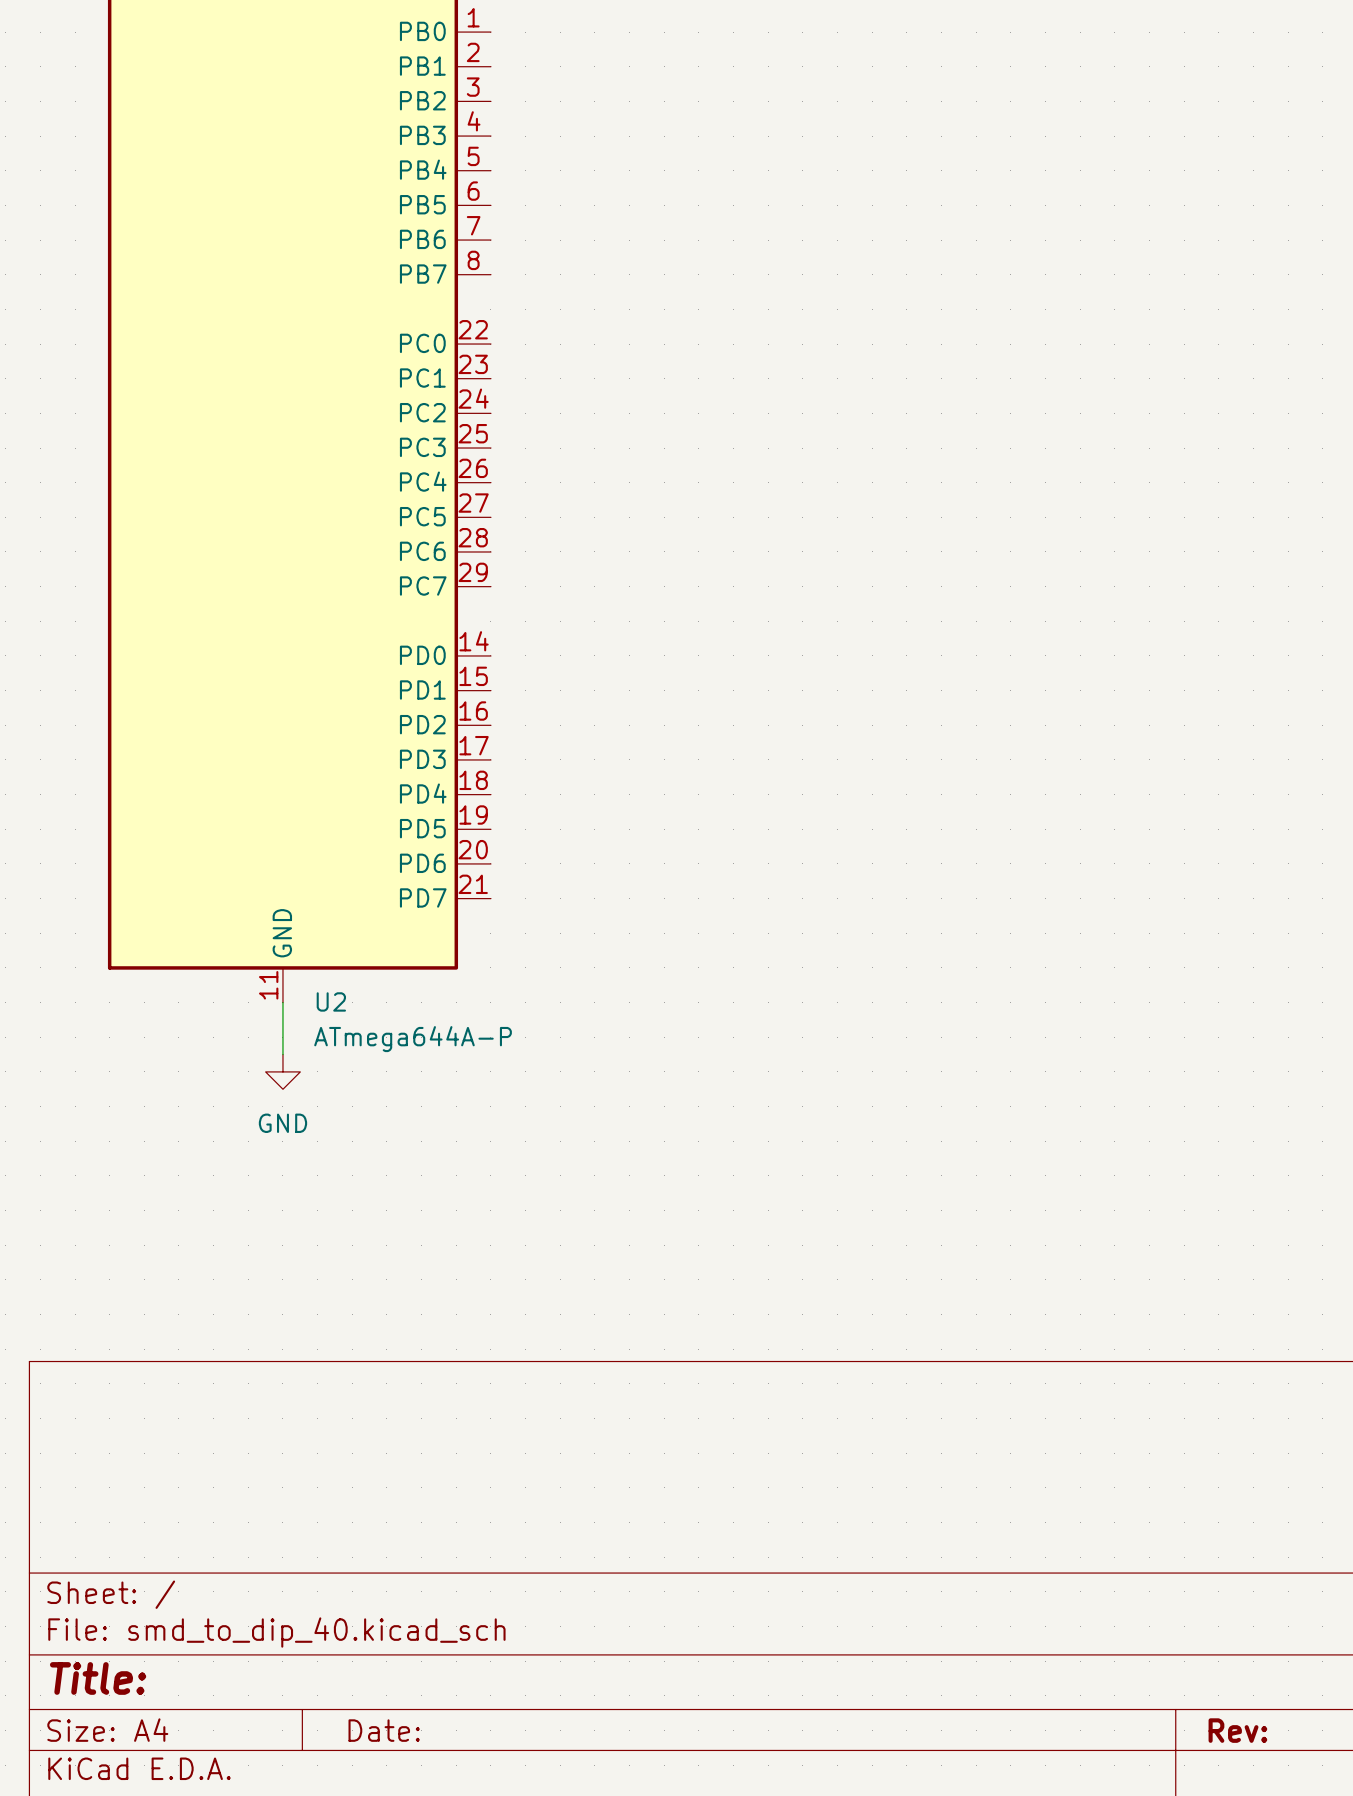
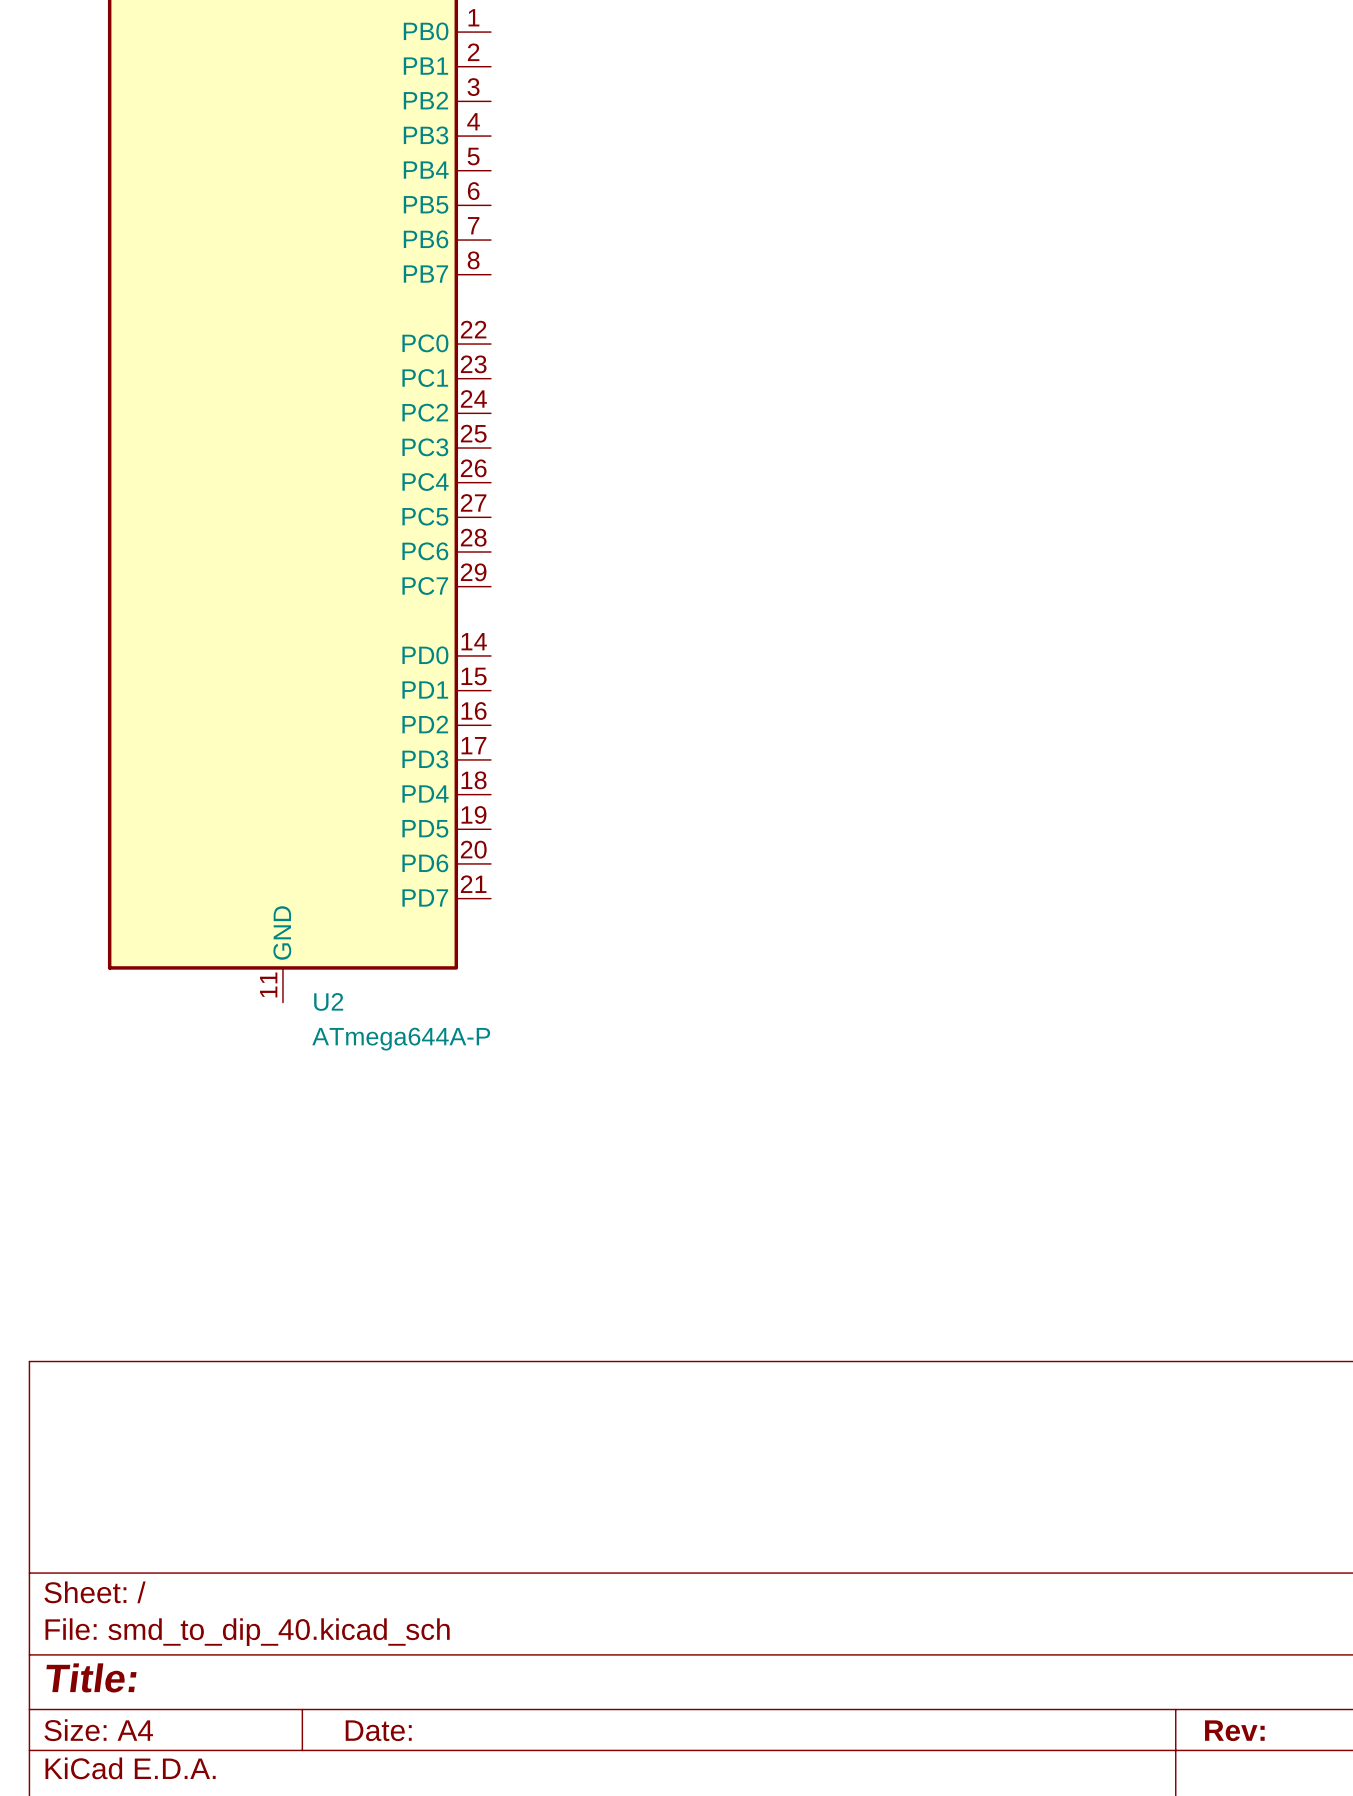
wire: (282, 1002) (282, 1054) -> none
power symbol: GND (282, 1071) -> none

